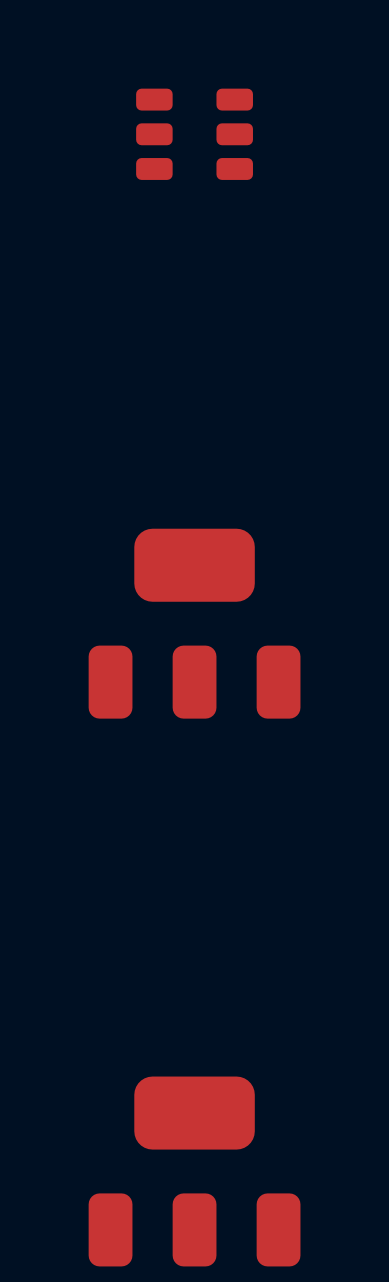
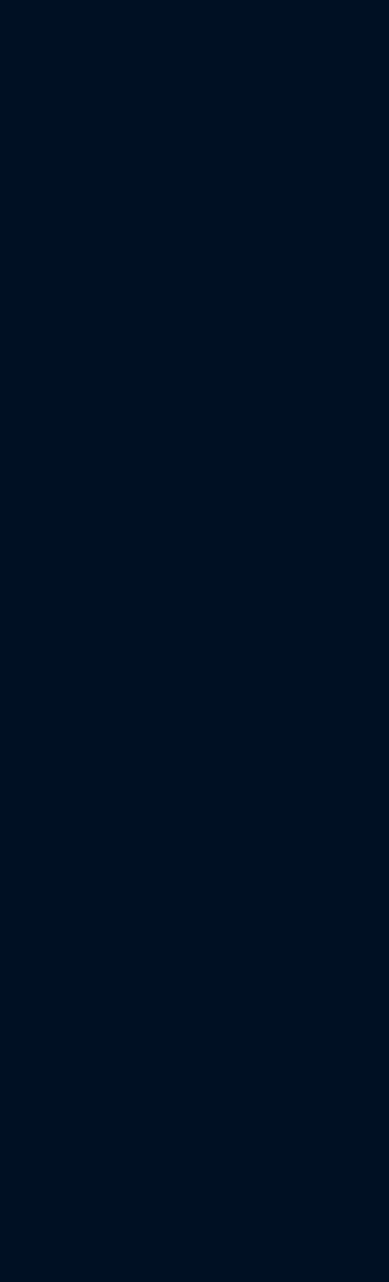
part: (194, 134) -> none
part: (194, 623) -> none
part: (194, 1171) -> none

